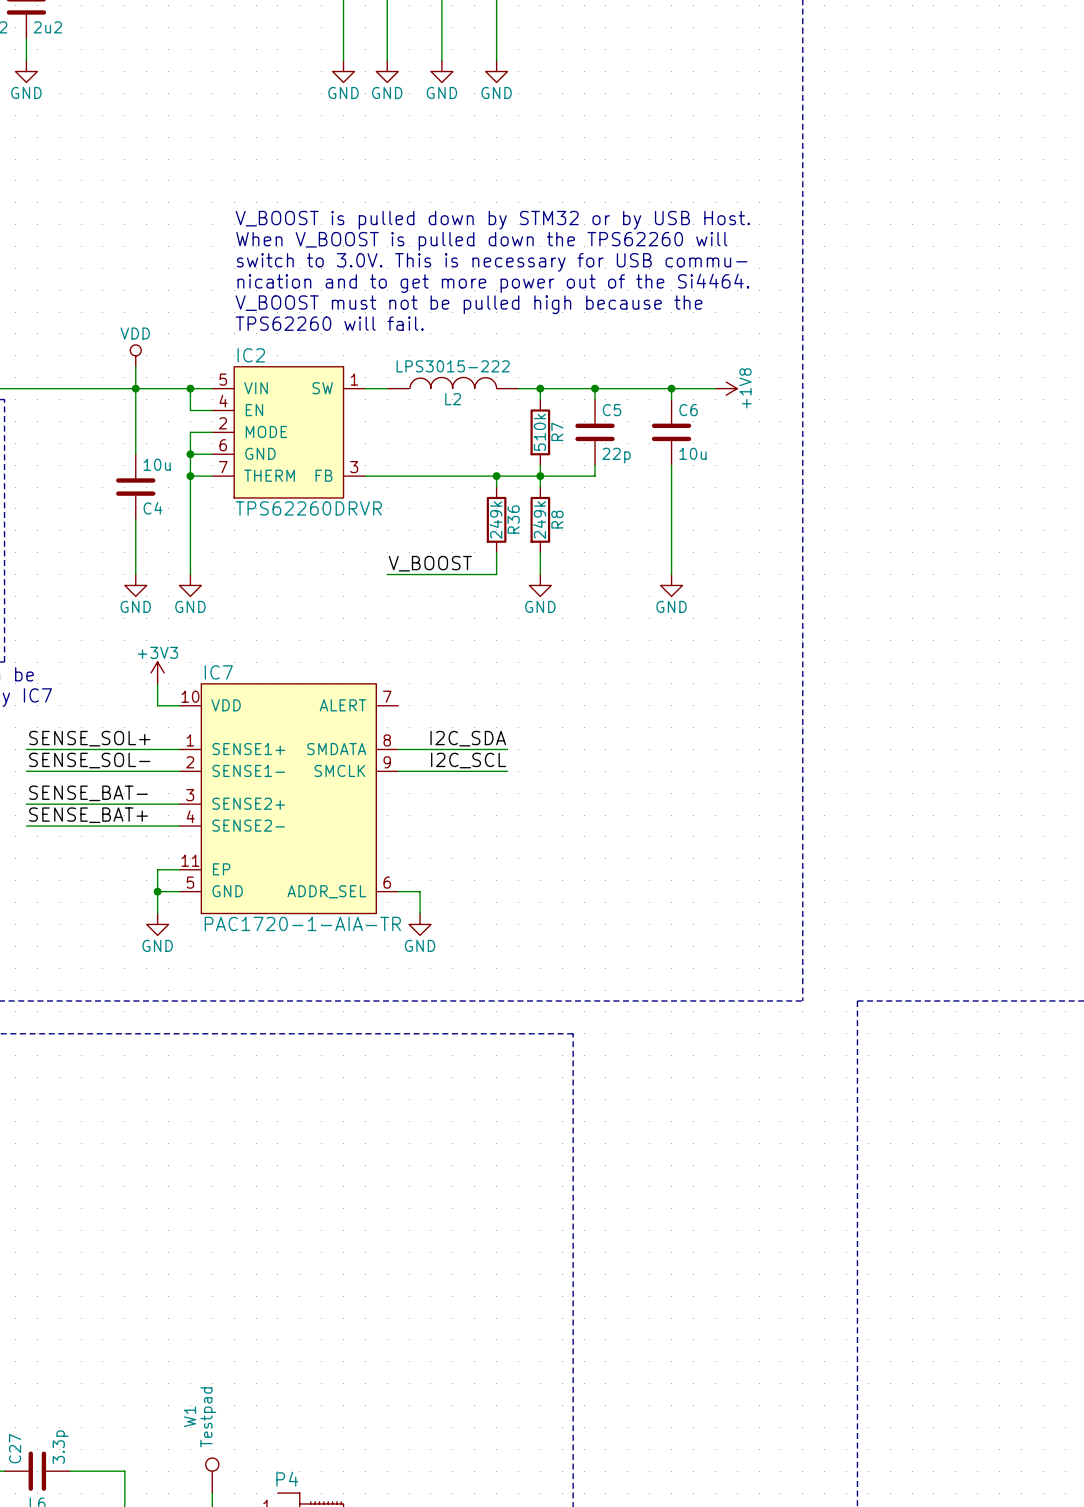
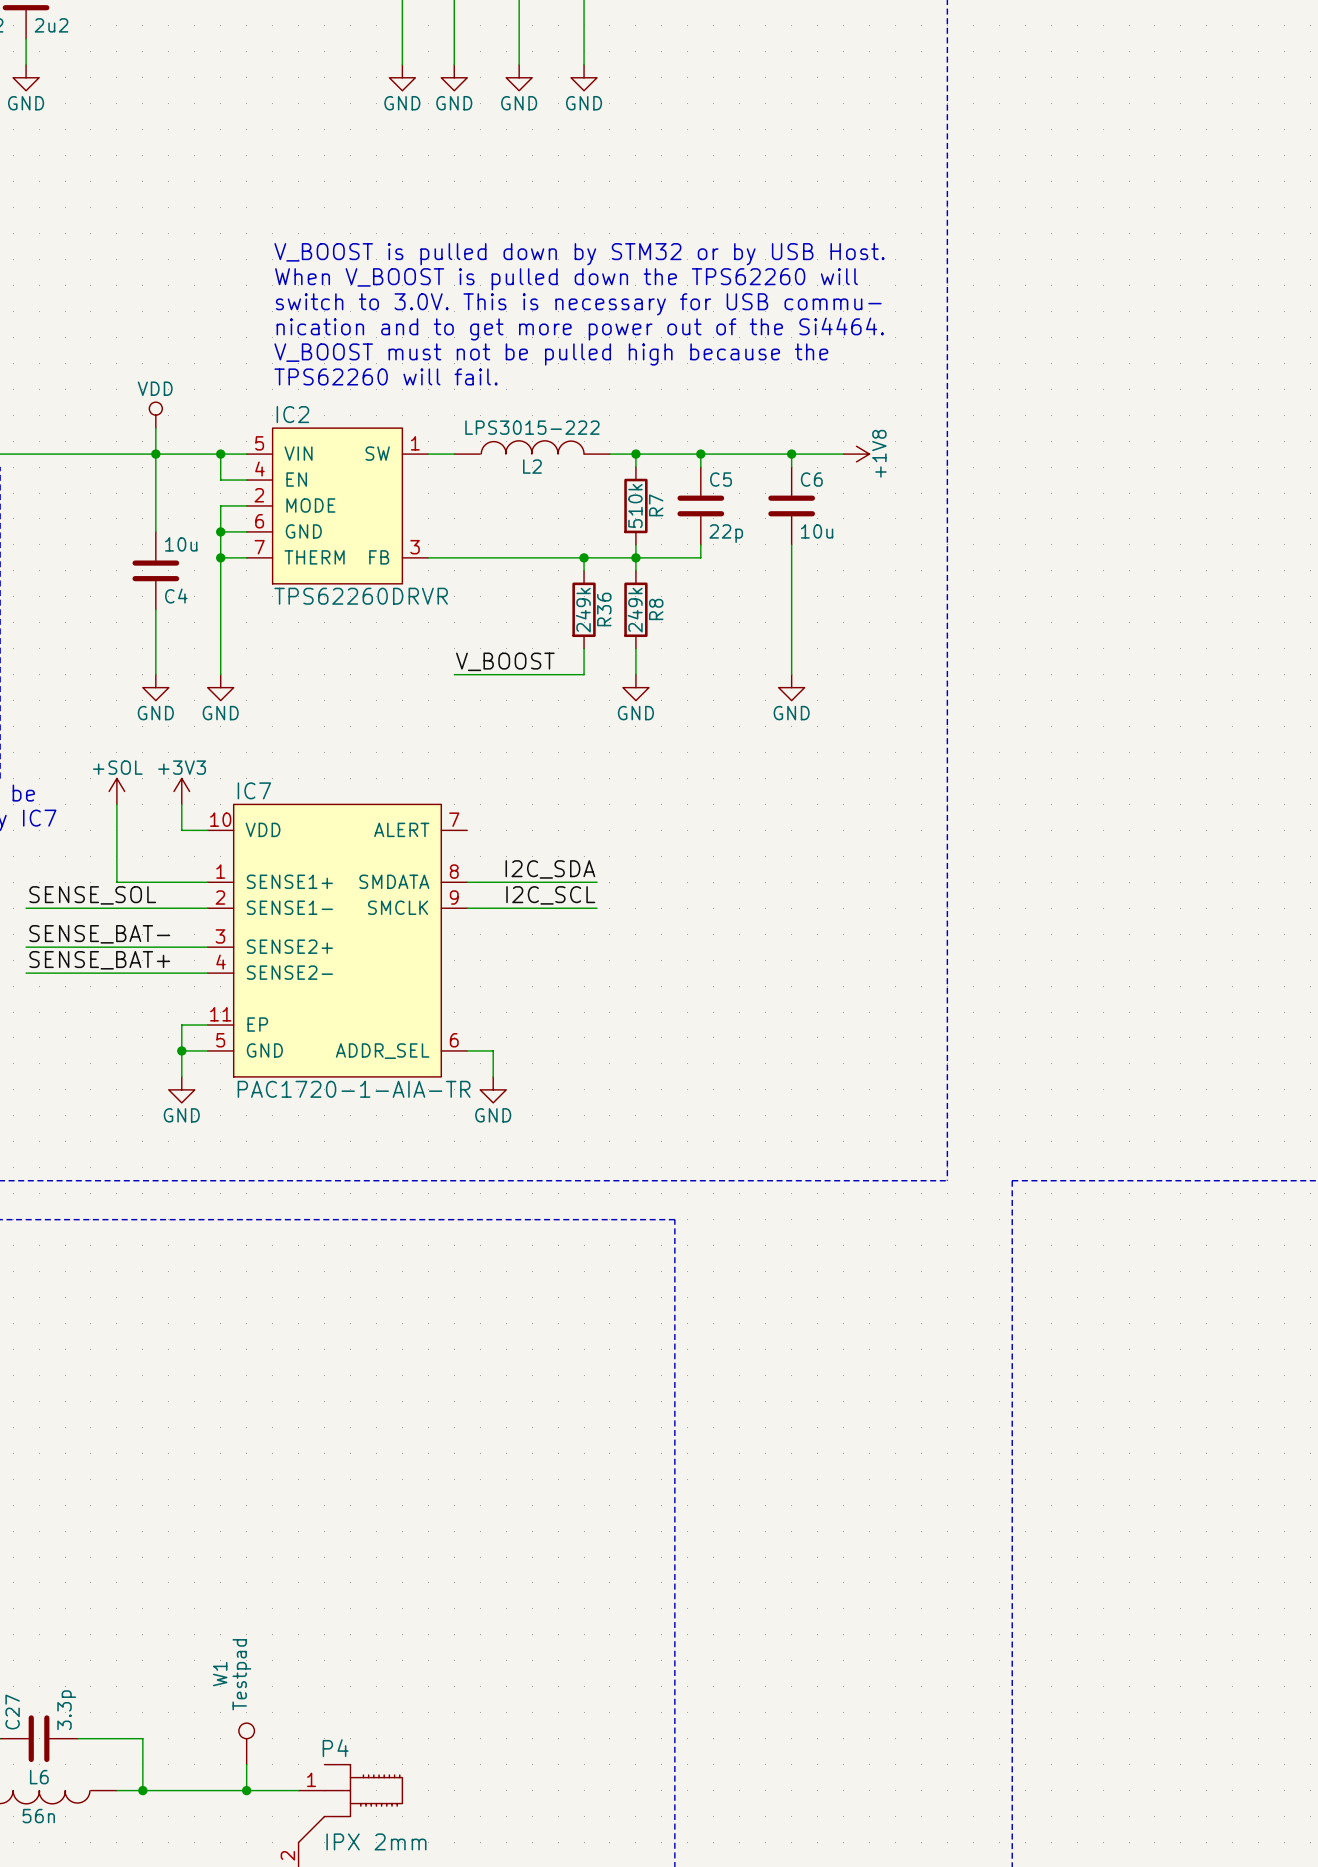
power symbol: none -> +SOL (116, 791)
label: SENSE_SOL+ (89, 738) -> none
wire: (26, 749) (102, 749) -> (116, 804) (116, 882)
label: SENSE_SOL- (89, 760) -> SENSE_SOL (92, 895)

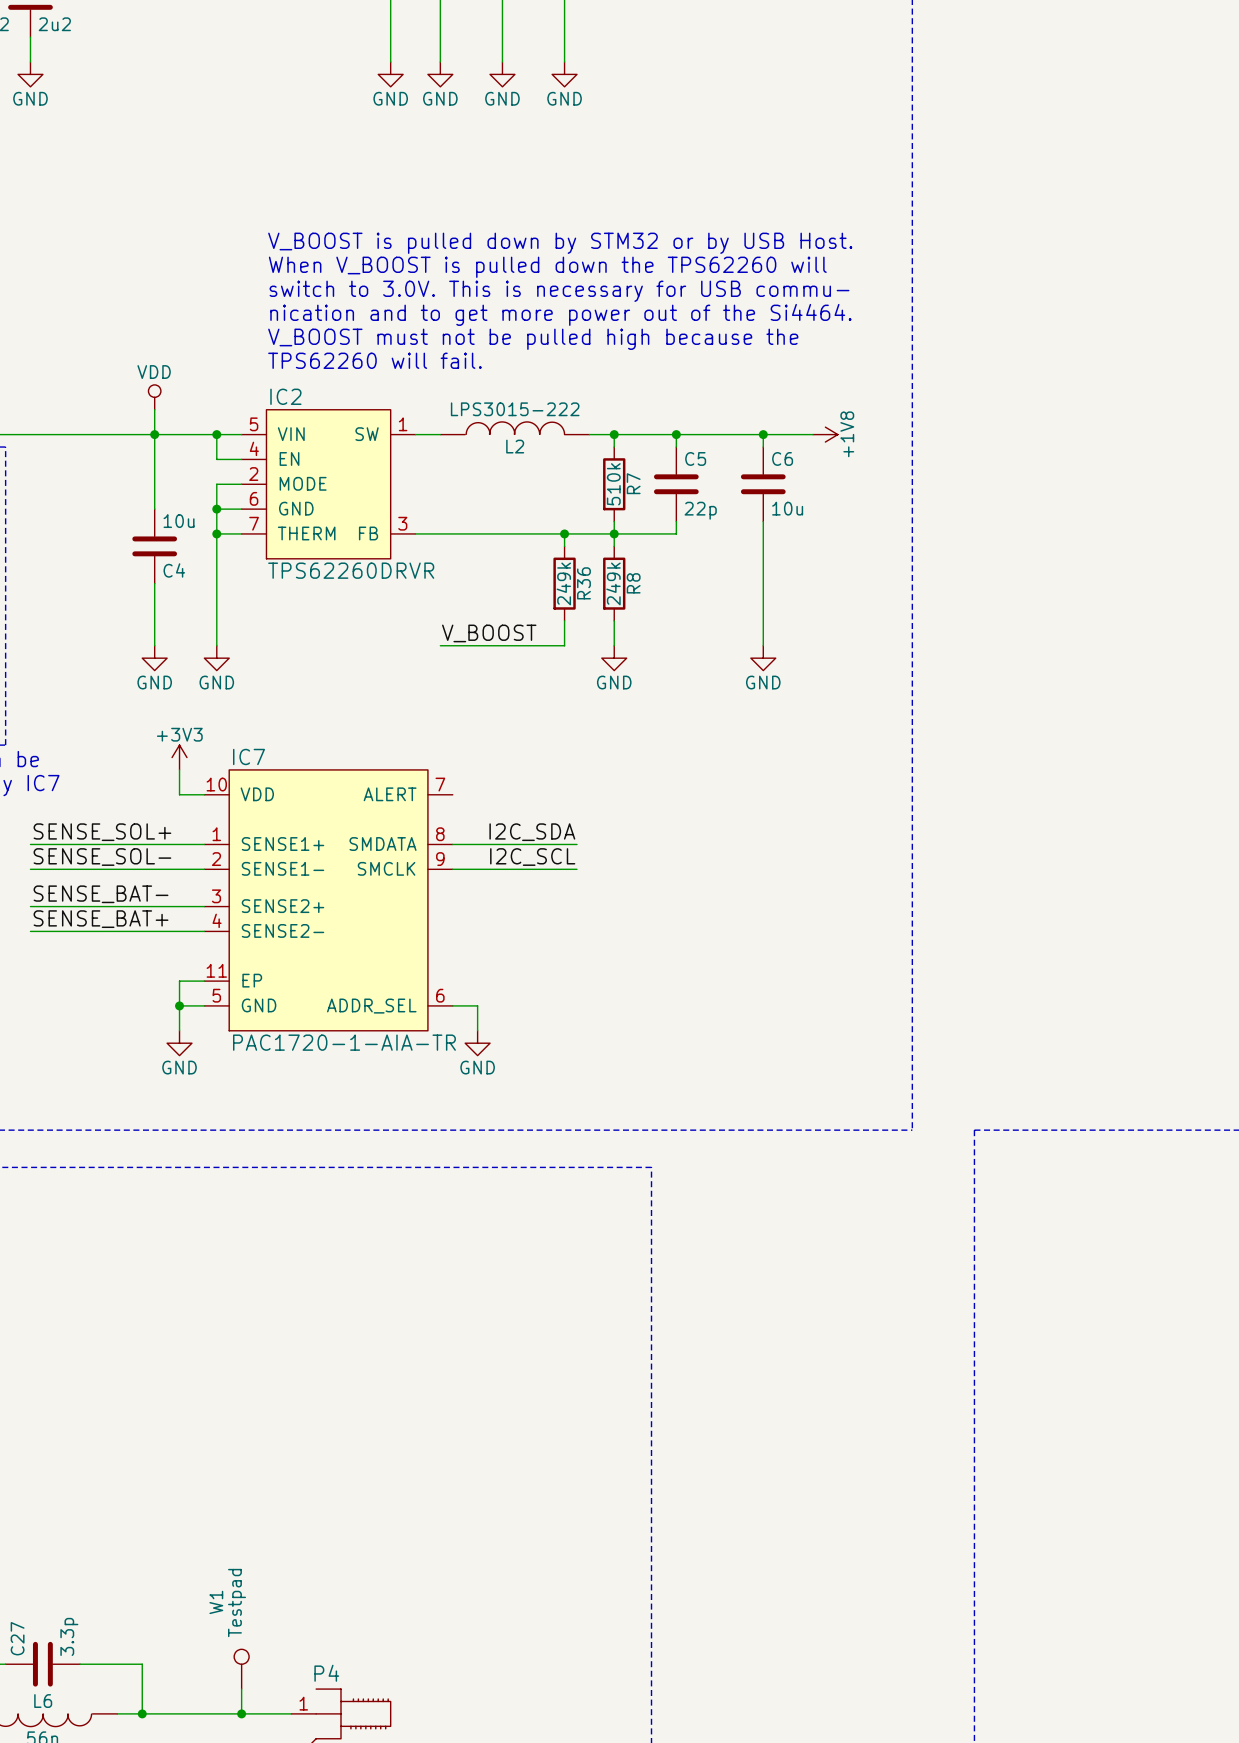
power symbol: +SOL (116, 791) -> none
wire: (116, 804) (116, 882) -> (30, 844) (117, 844)
label: none -> SENSE_SOL+ (102, 832)
label: SENSE_SOL (92, 895) -> SENSE_SOL- (102, 857)

